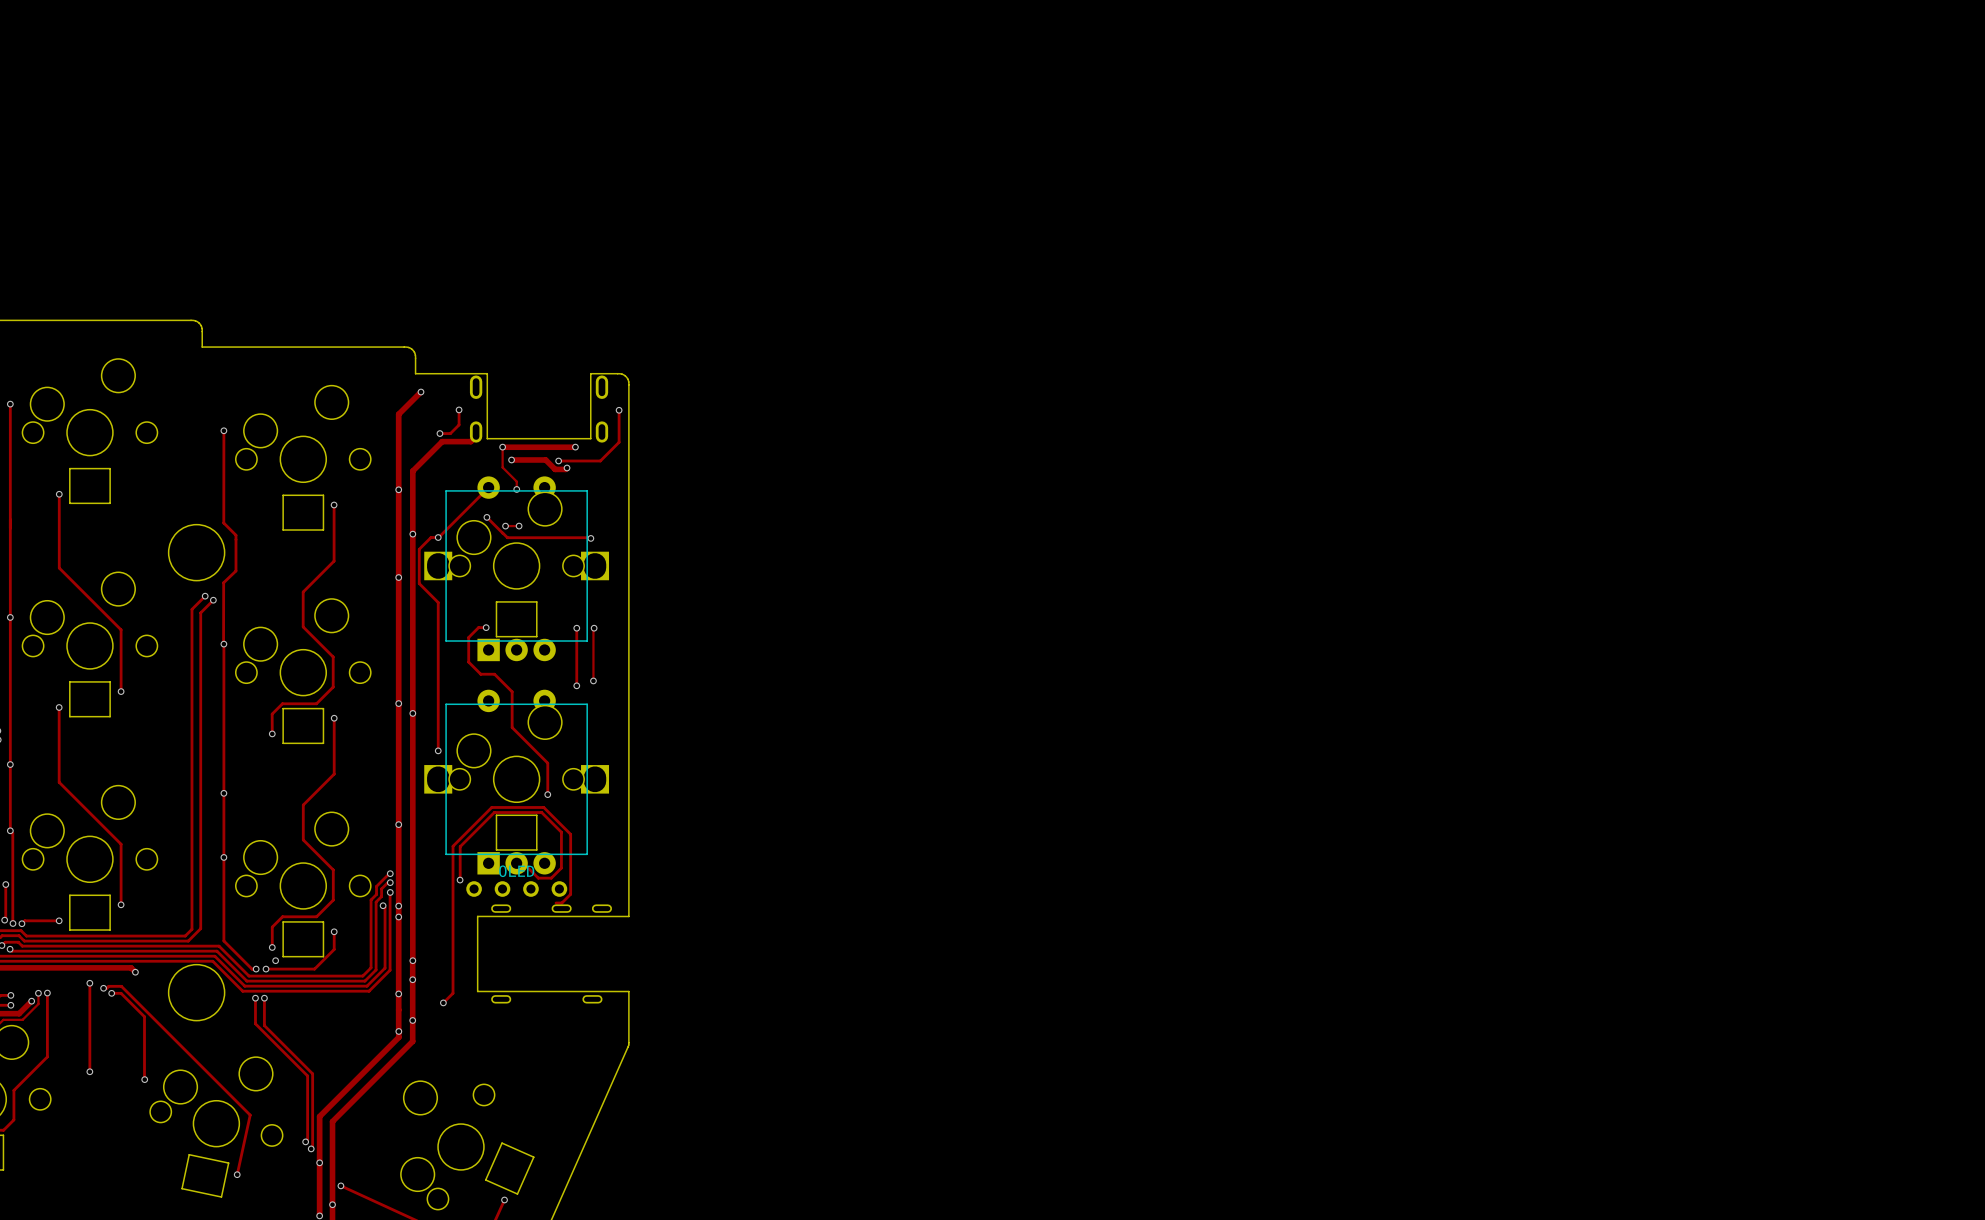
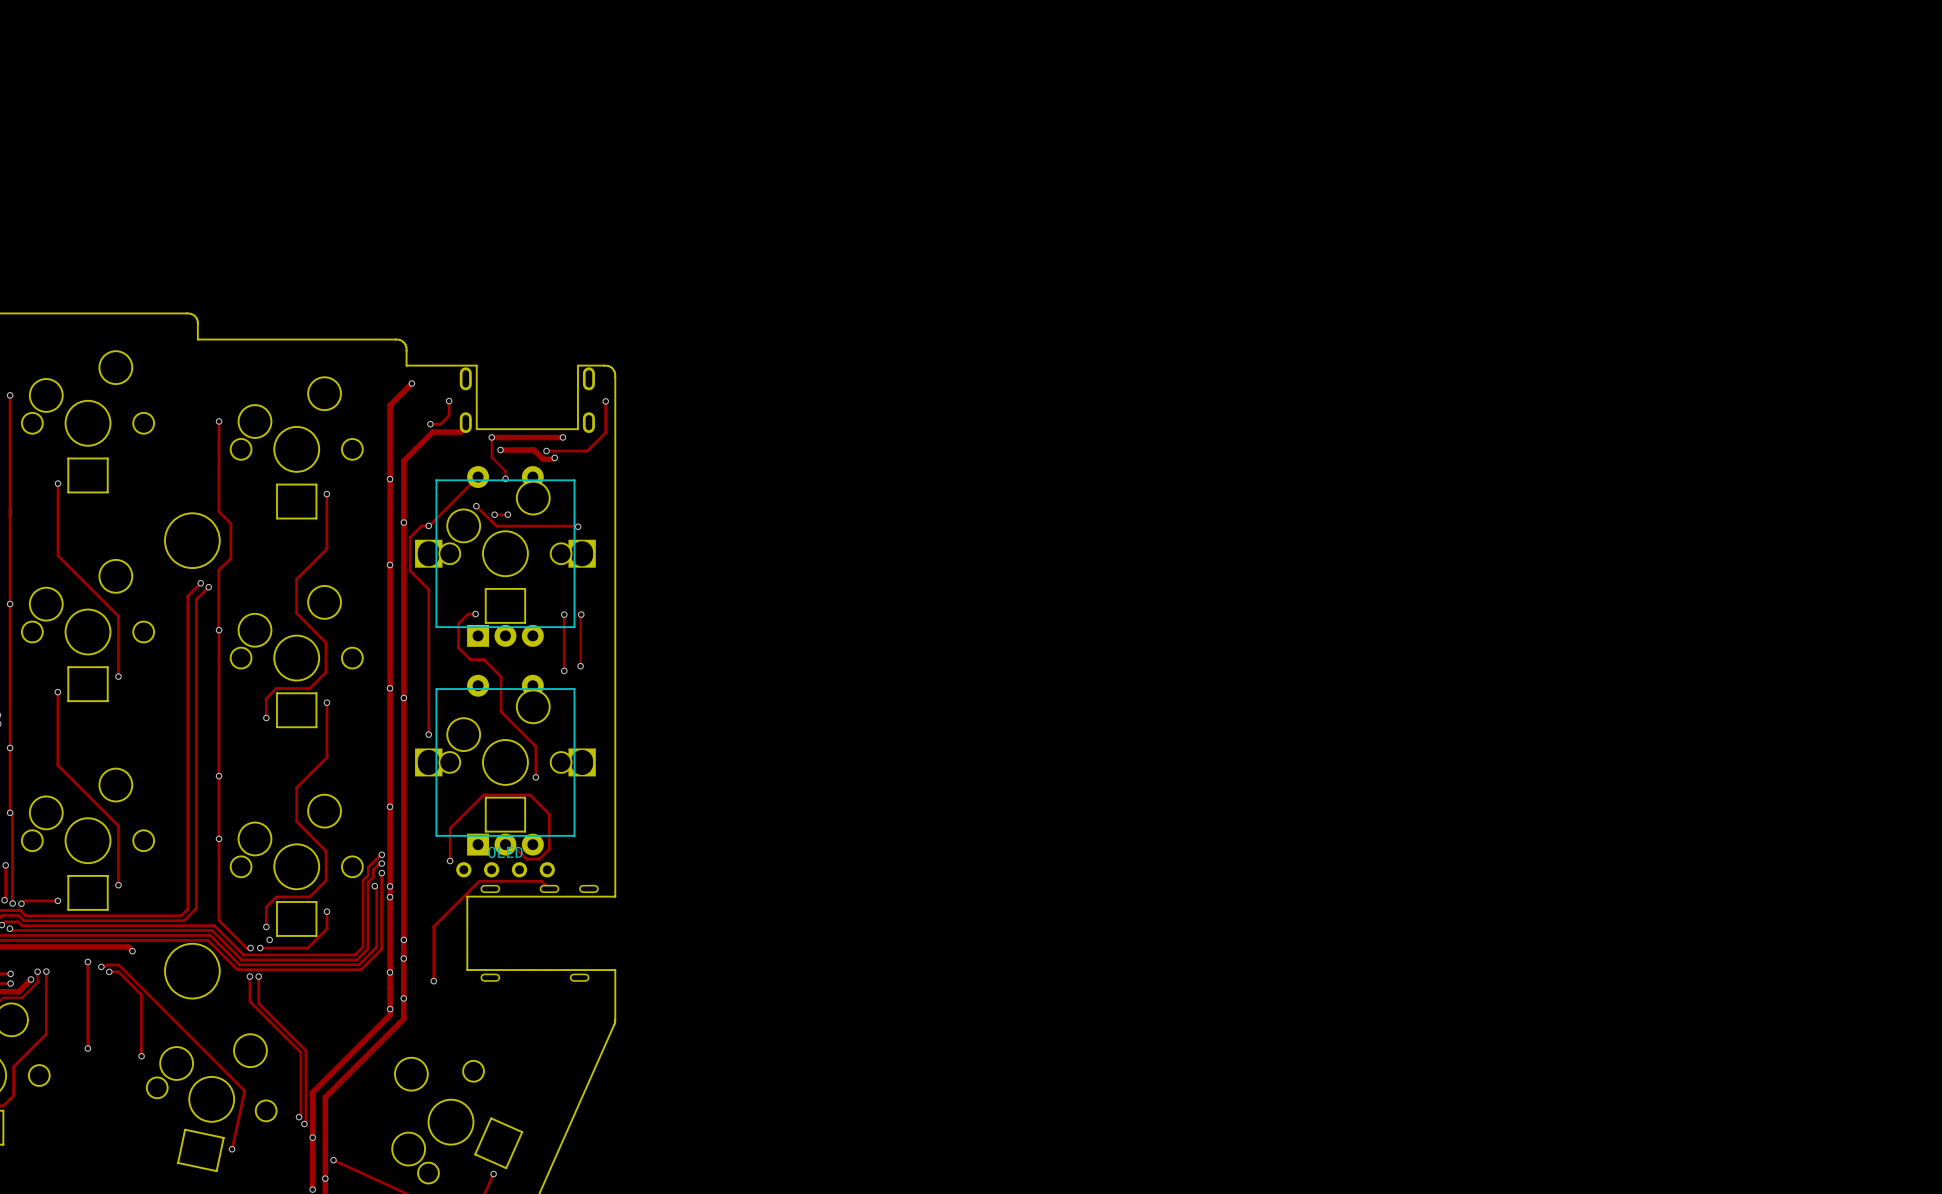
track: (556, 903) (561, 903) (570, 894) (570, 834) (543, 807) (491, 807) (453, 846) (453, 993) (443, 1002) -> (549, 888) (541, 881) (479, 881) (433, 926) (433, 981)

